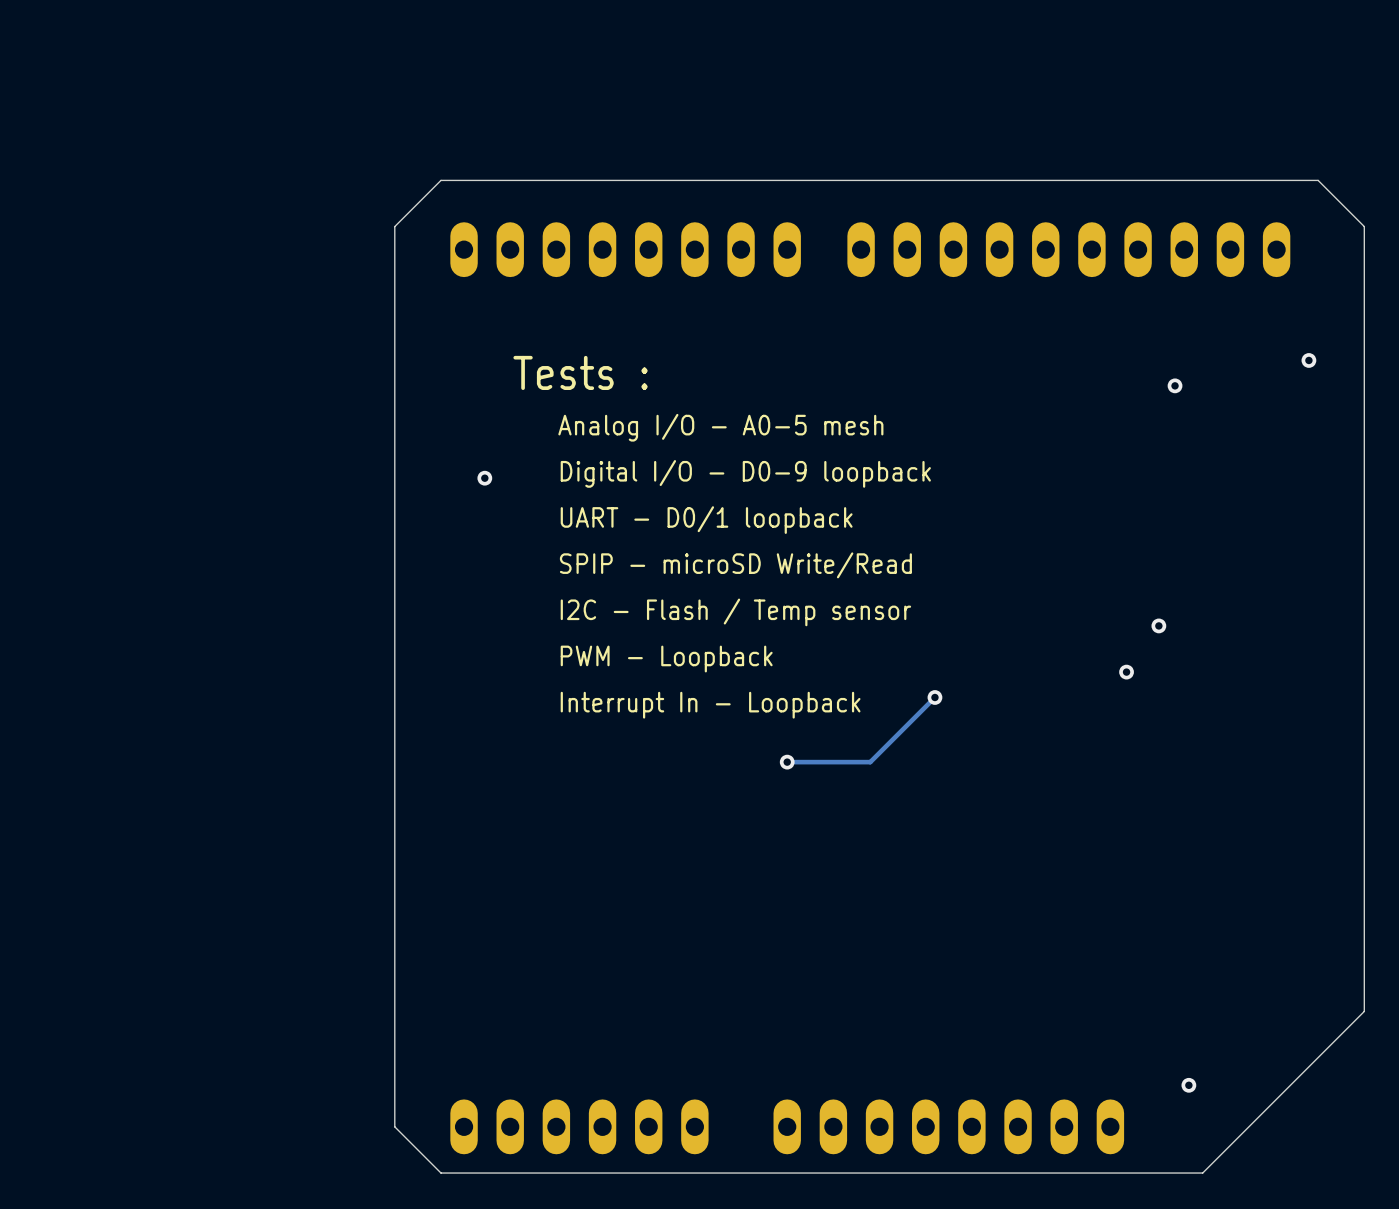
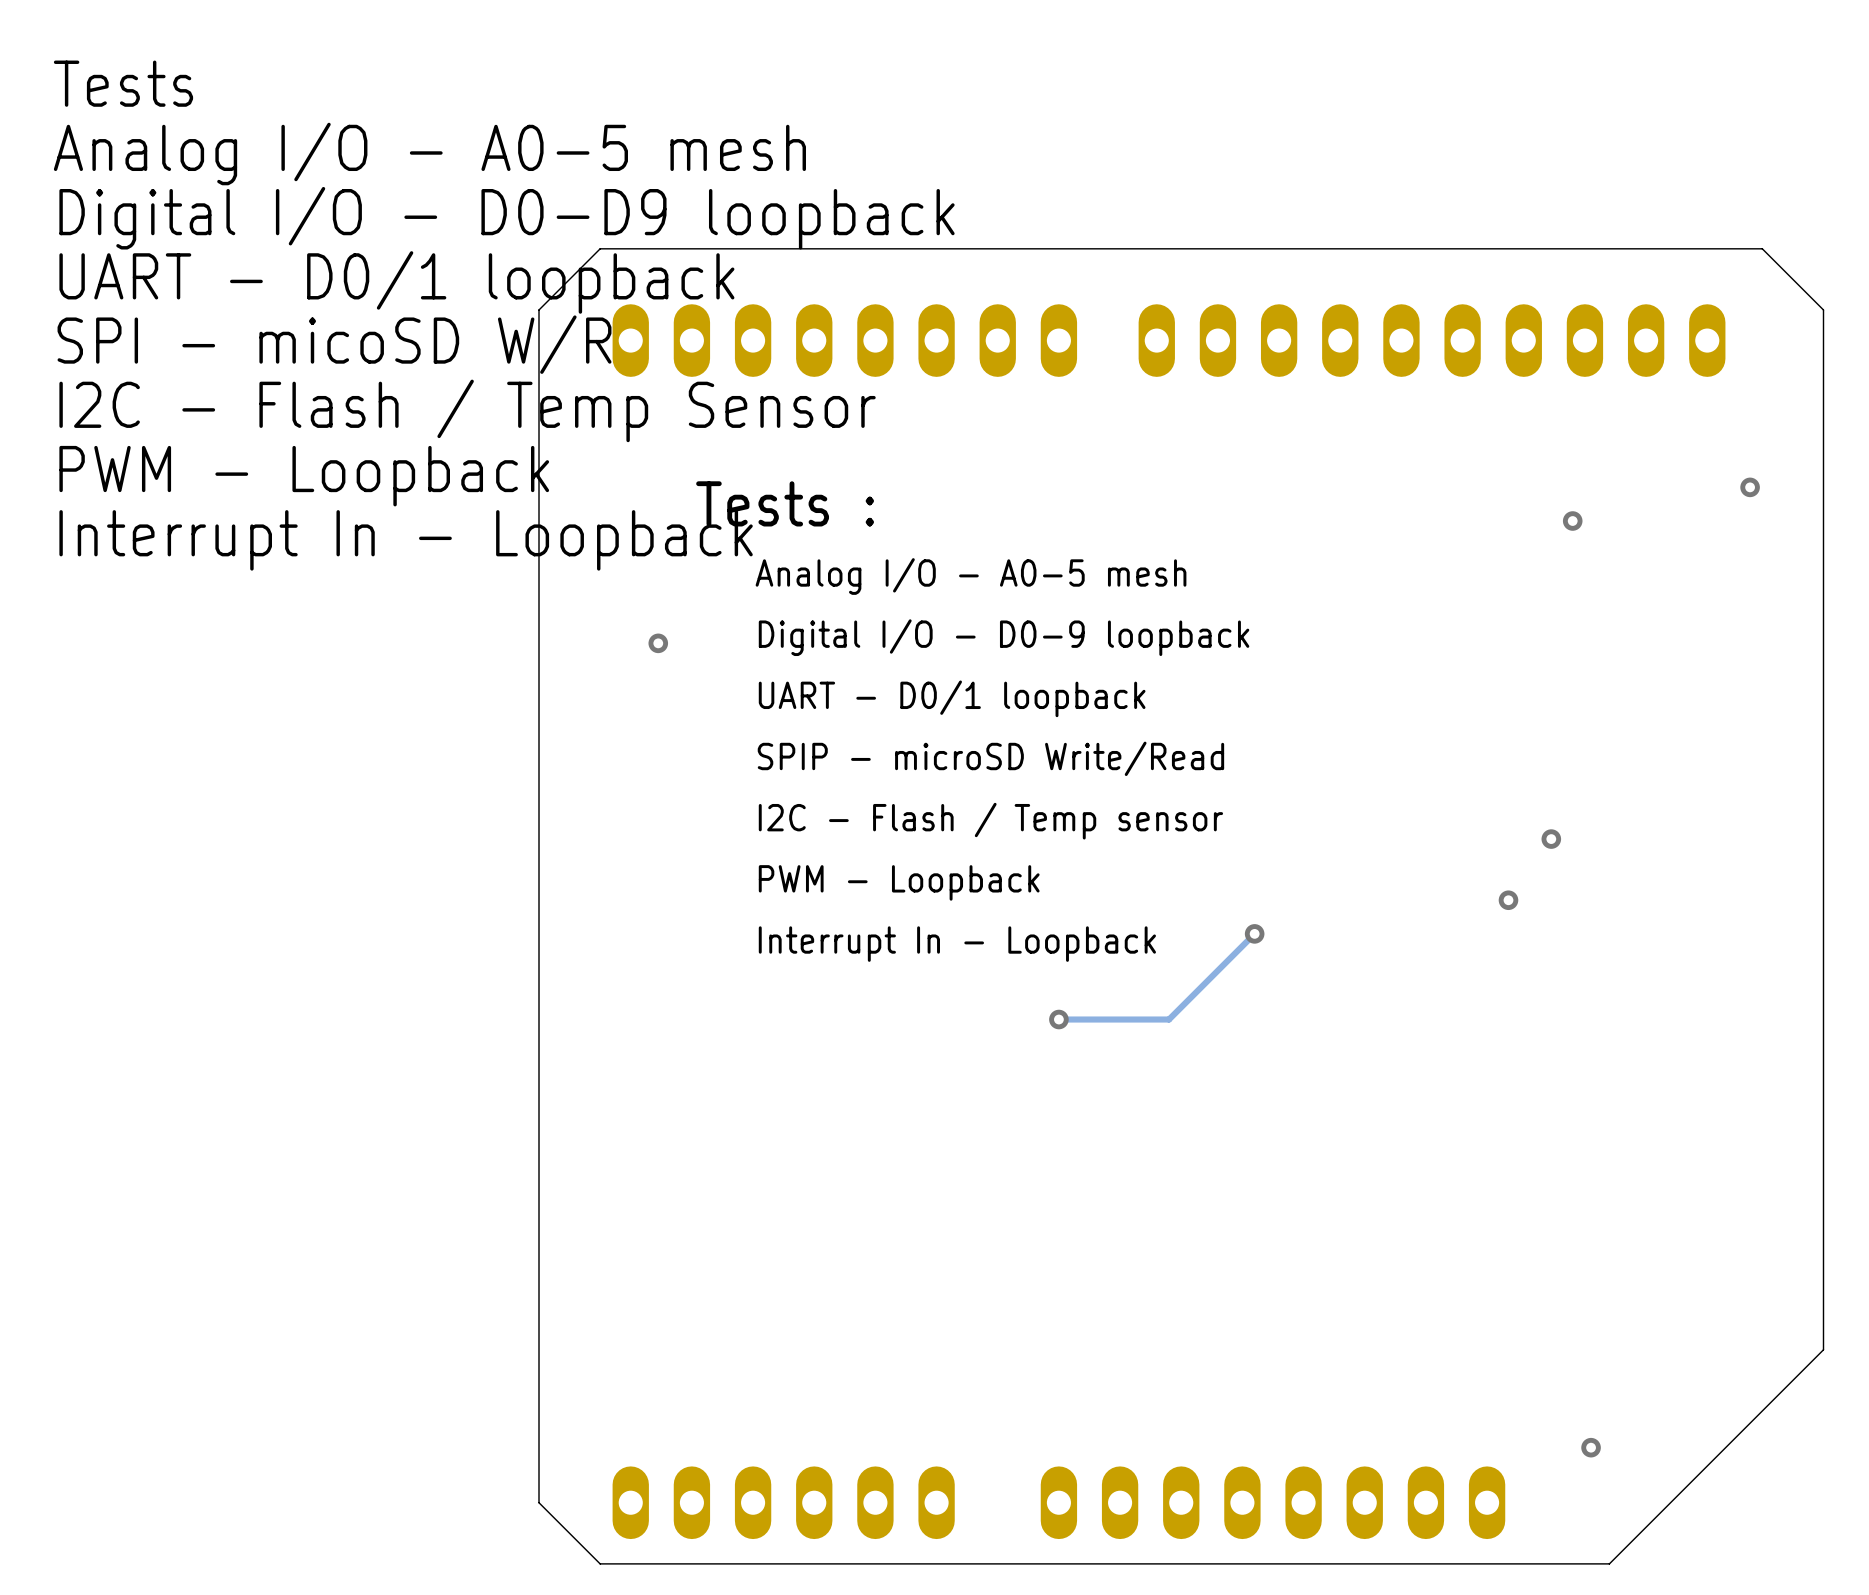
text: none -> Tests (123, 83)
text: none -> Analog I/O - A0-5 mesh (429, 154)
text: none -> Digital I/O - D0-D9 loopback (507, 218)
text: none -> UART - D0/1 loopback (396, 282)
text: none -> SPI - micoSD W/R (334, 344)
text: none -> I2C - Flash / Temp Sensor (467, 410)
text: none -> PWM - Loopback (304, 476)
text: none -> Interrupt In - Loopback (406, 540)

